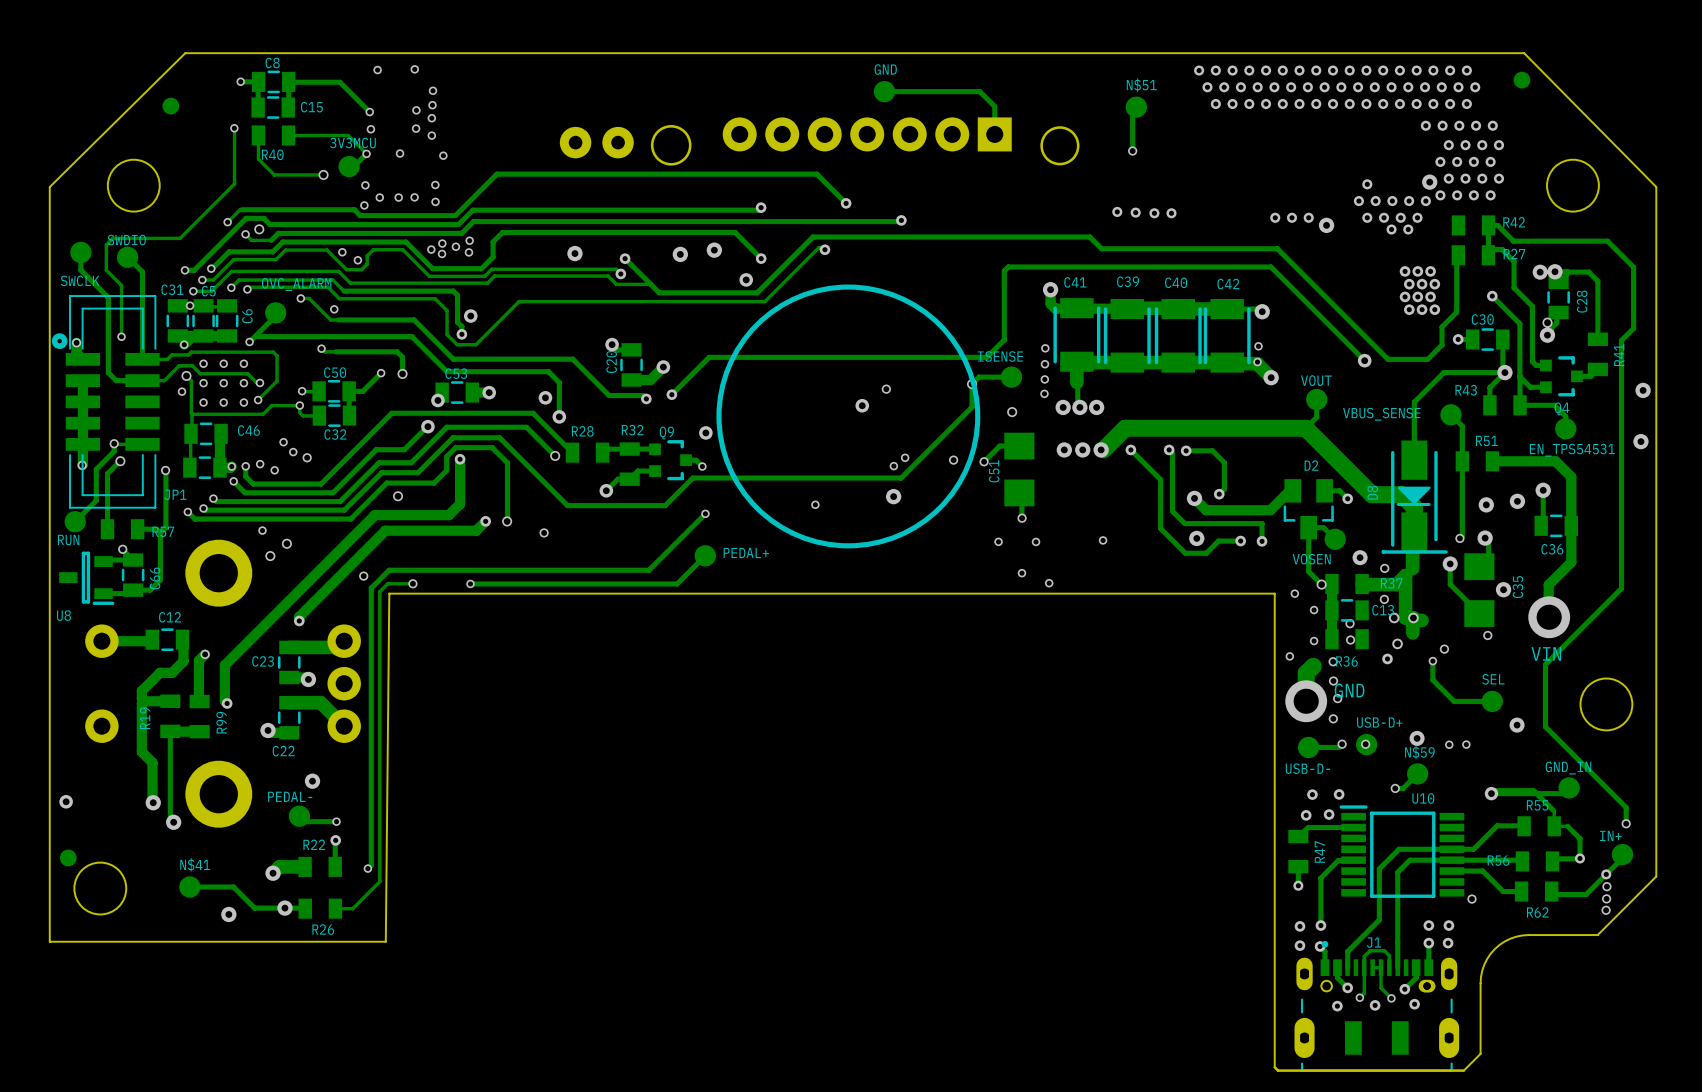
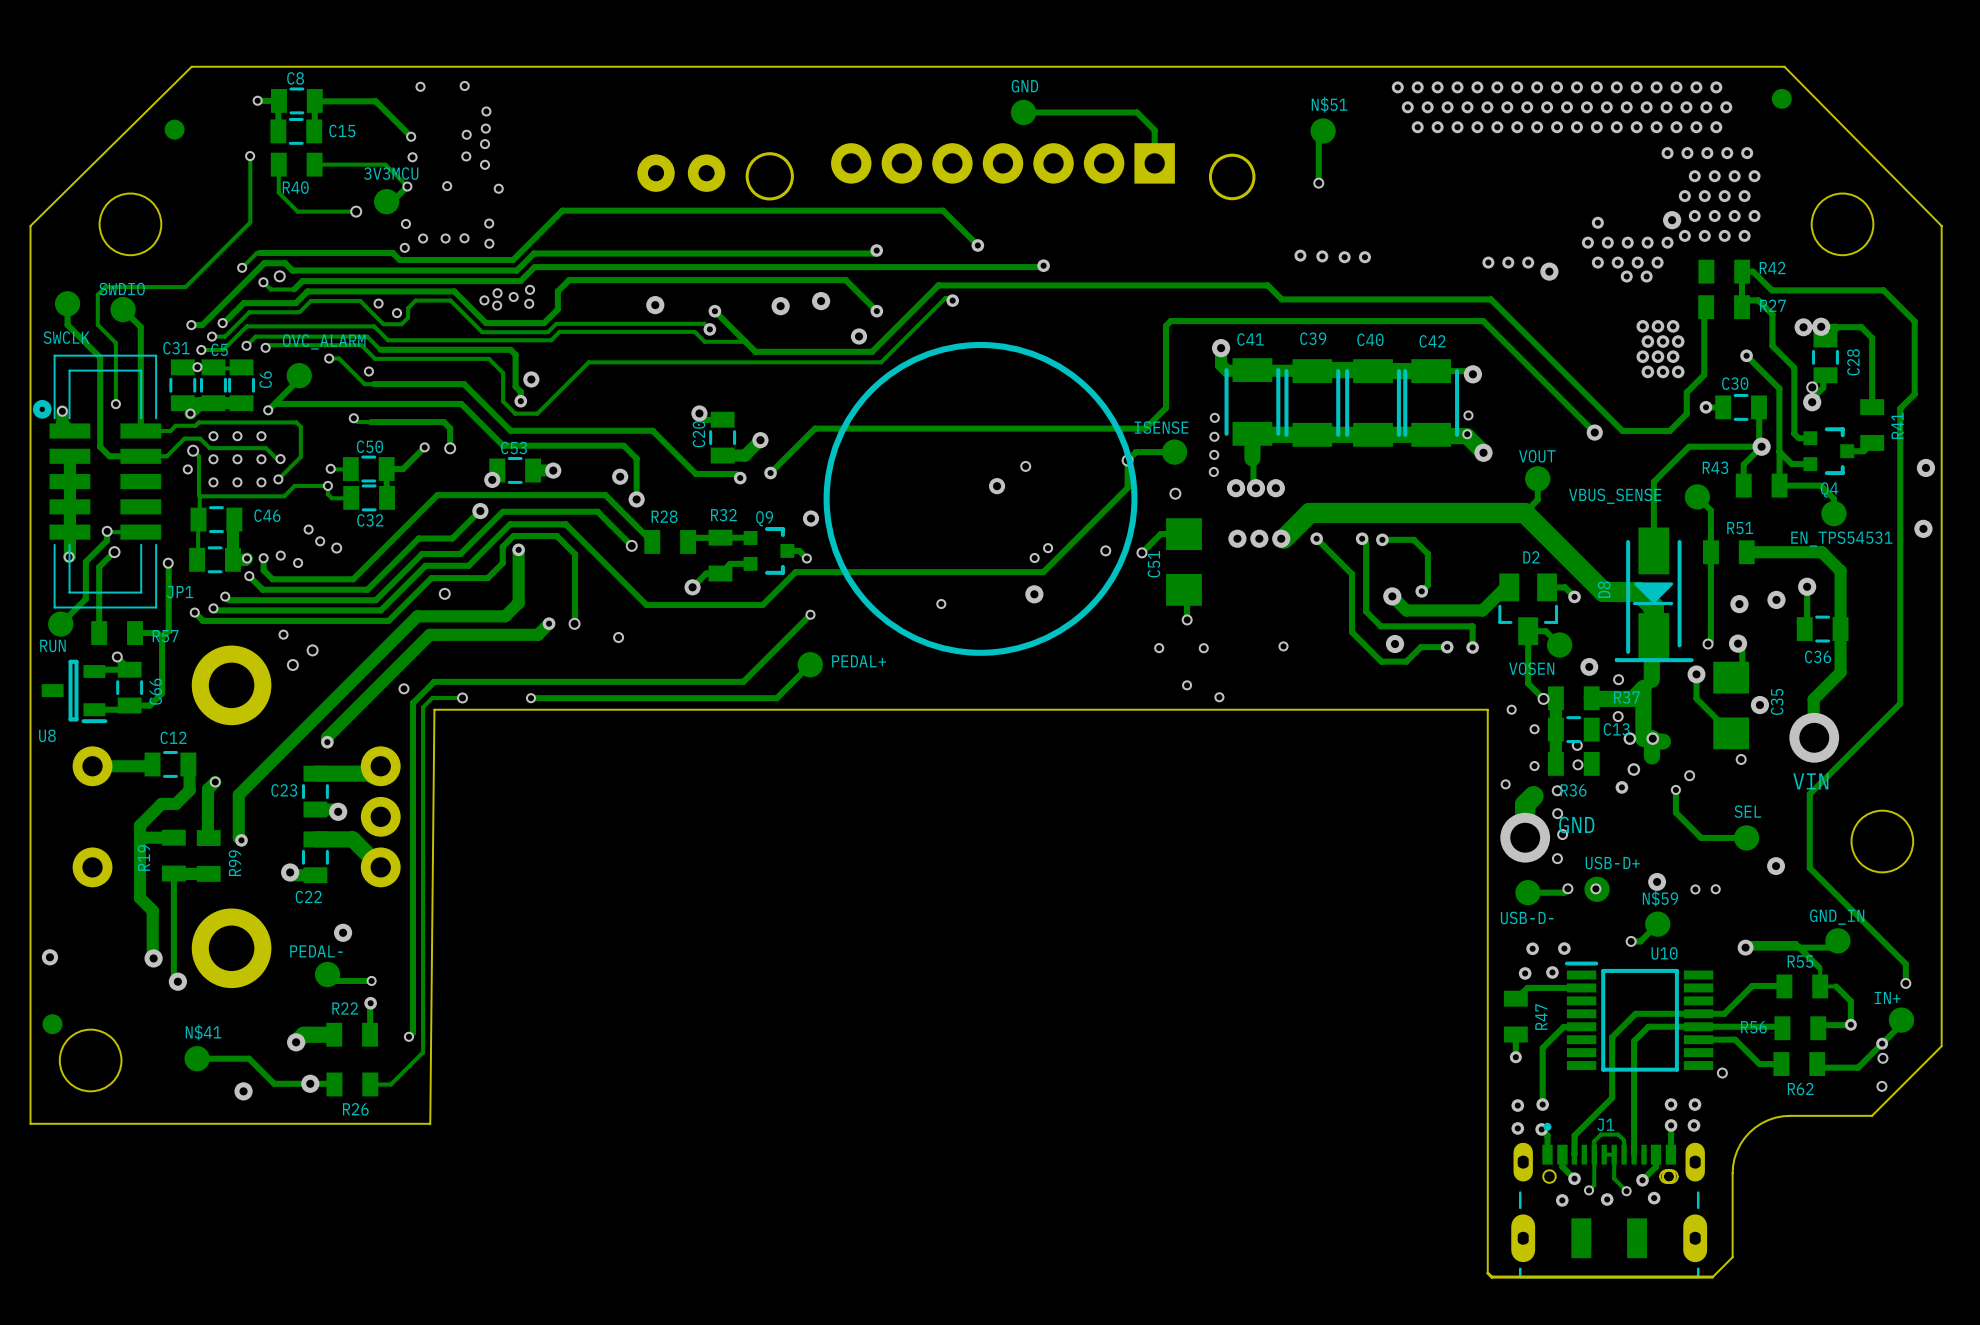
via: (1606, 898) -> none

